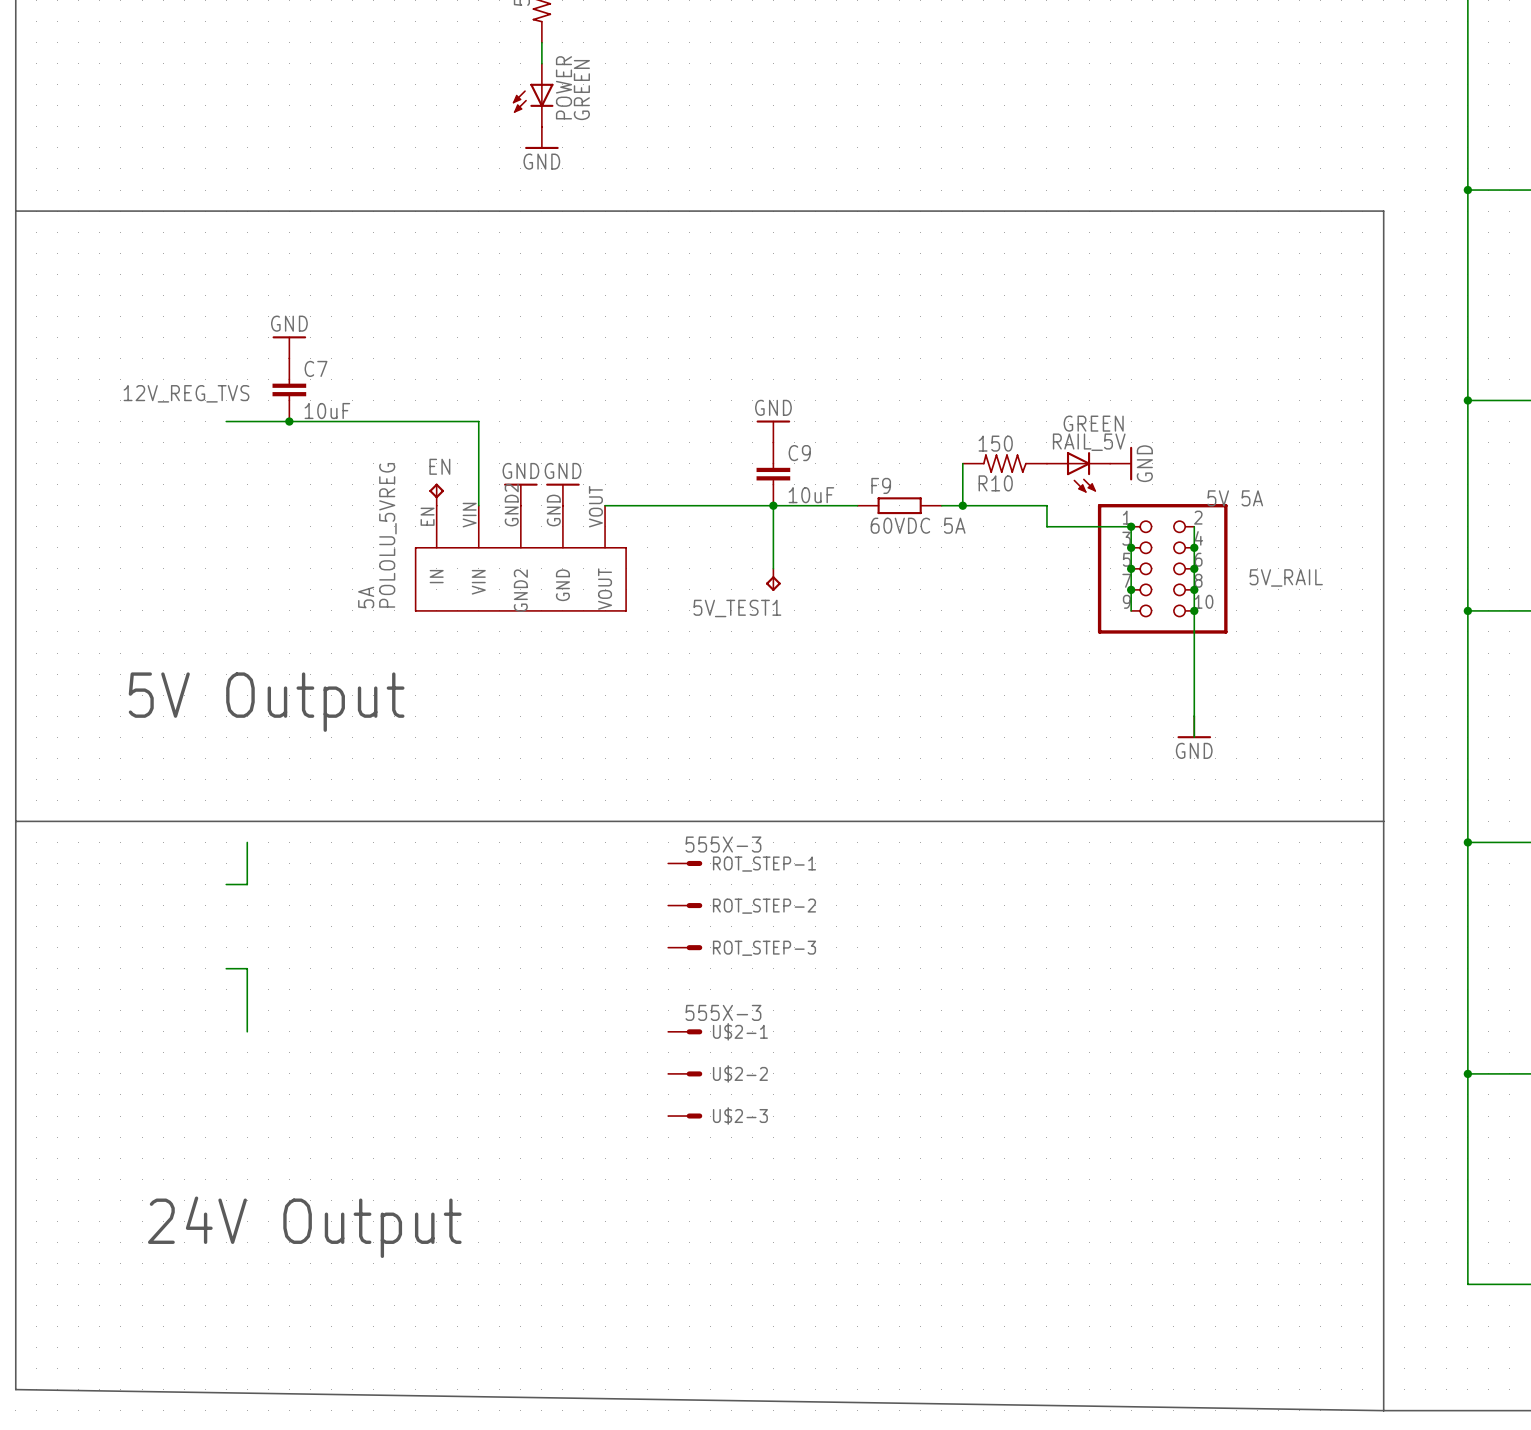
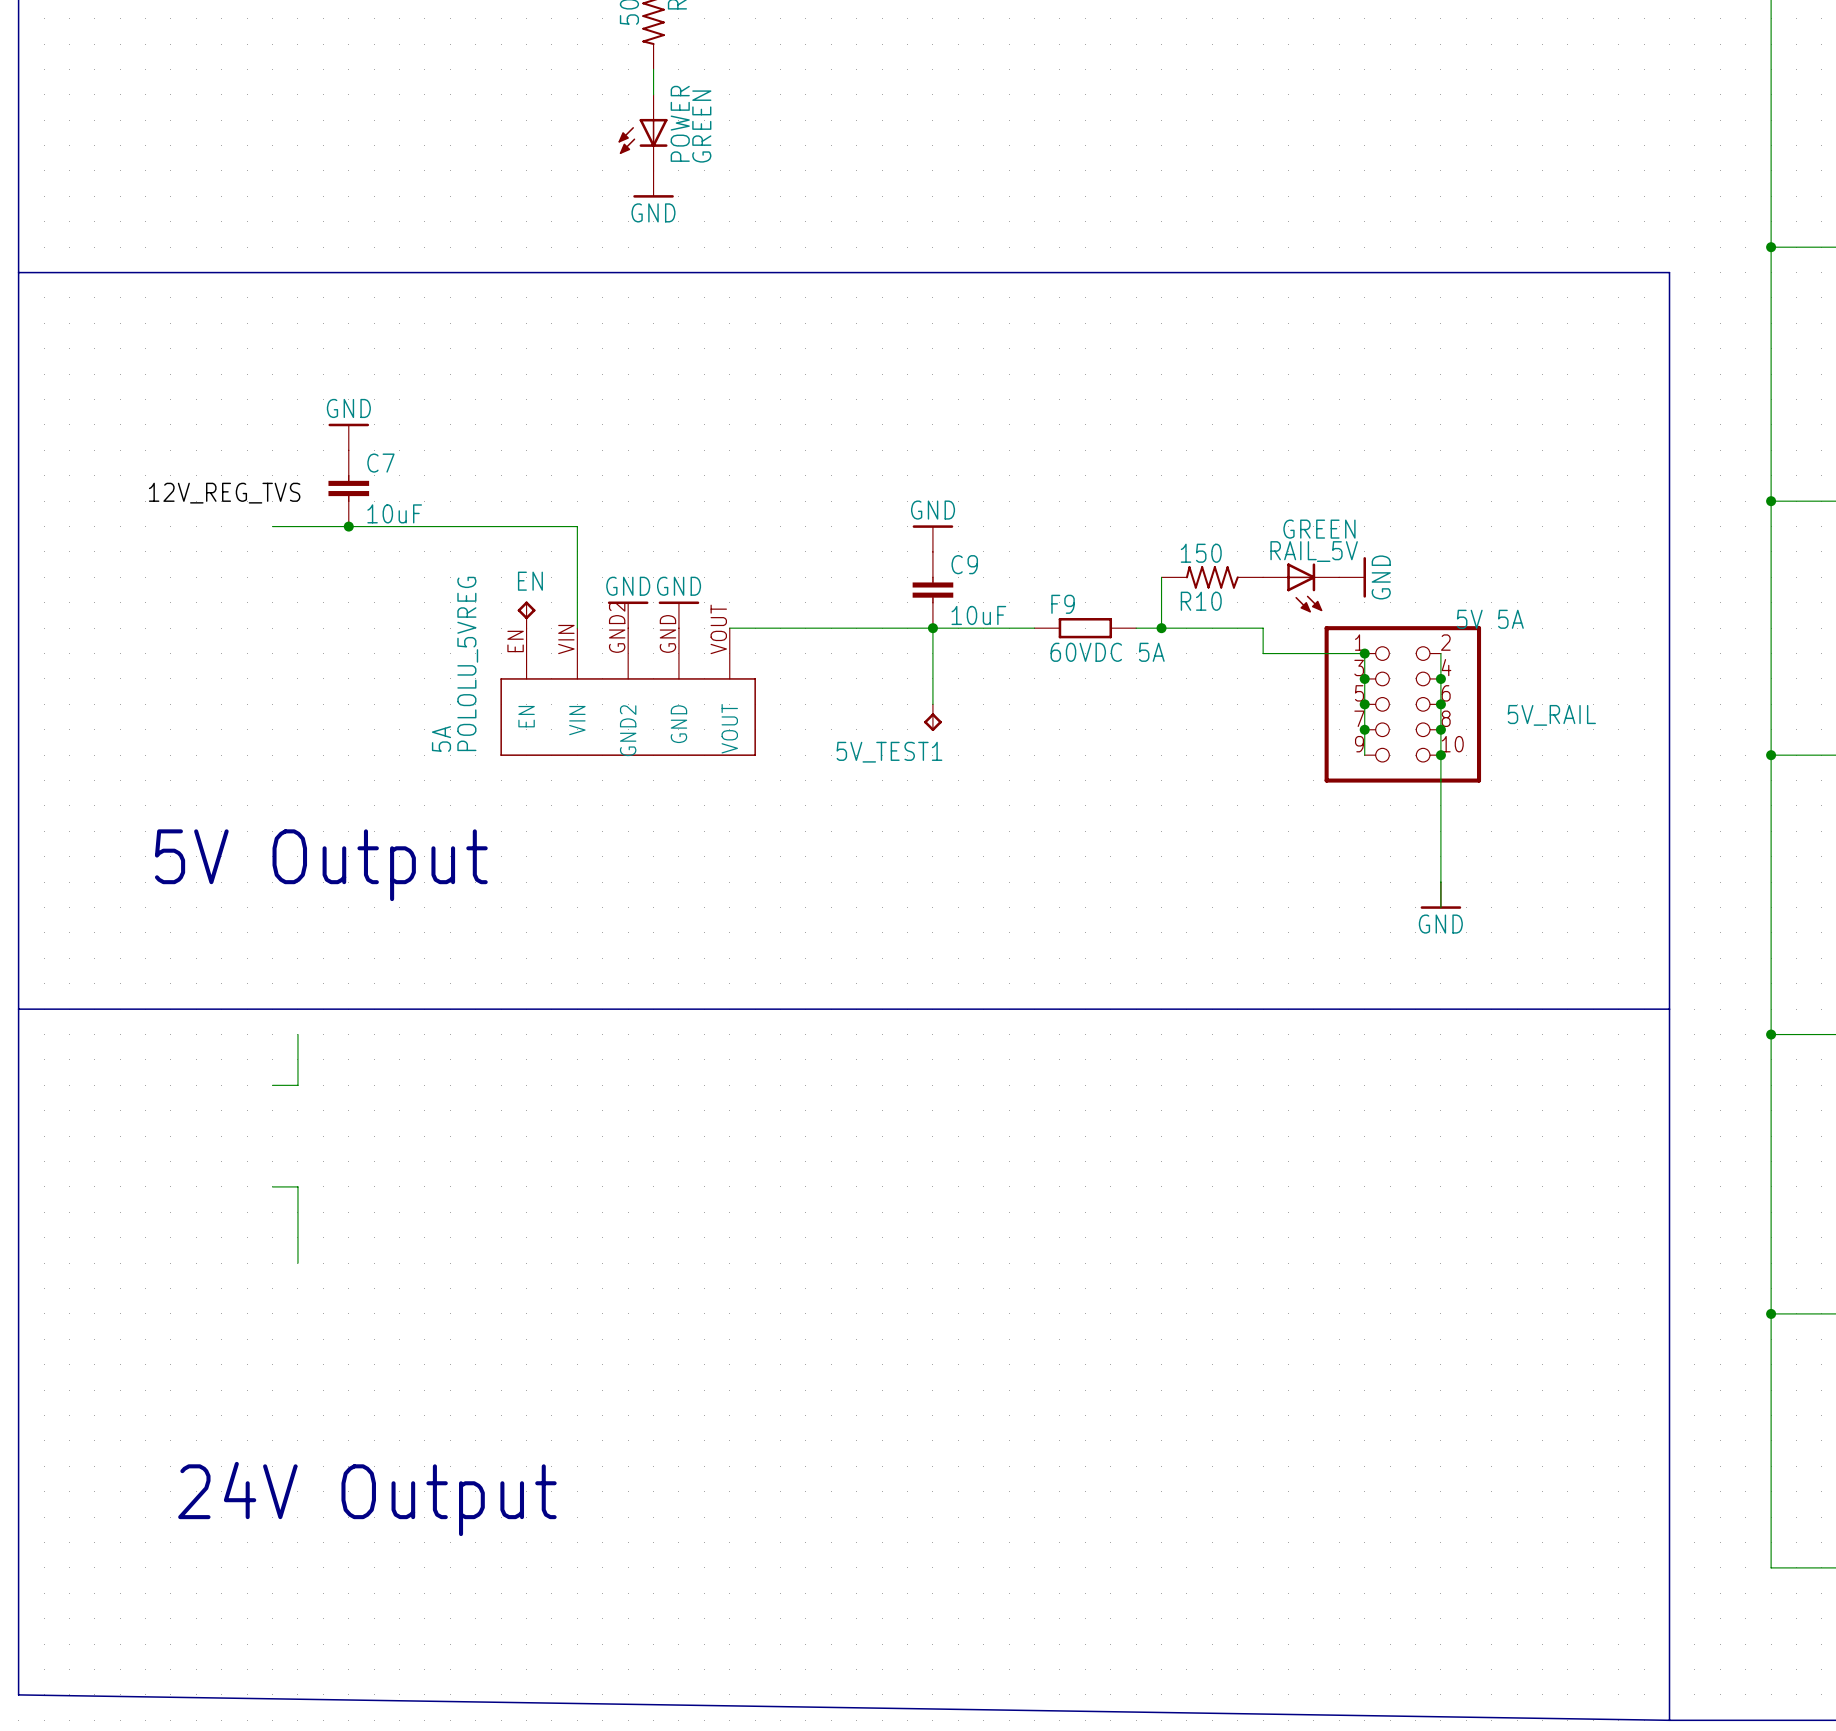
5A pin name: IN (436, 576) -> EN (526, 716)
ROT_STEP-1: 555X-3 (685, 863) -> none
ROT_STEP-2: (685, 905) -> none
ROT_STEP-3: (685, 947) -> none
U$2-1: 555X-3 (685, 1031) -> none
U$2-2: (685, 1073) -> none
U$2-3: (685, 1116) -> none

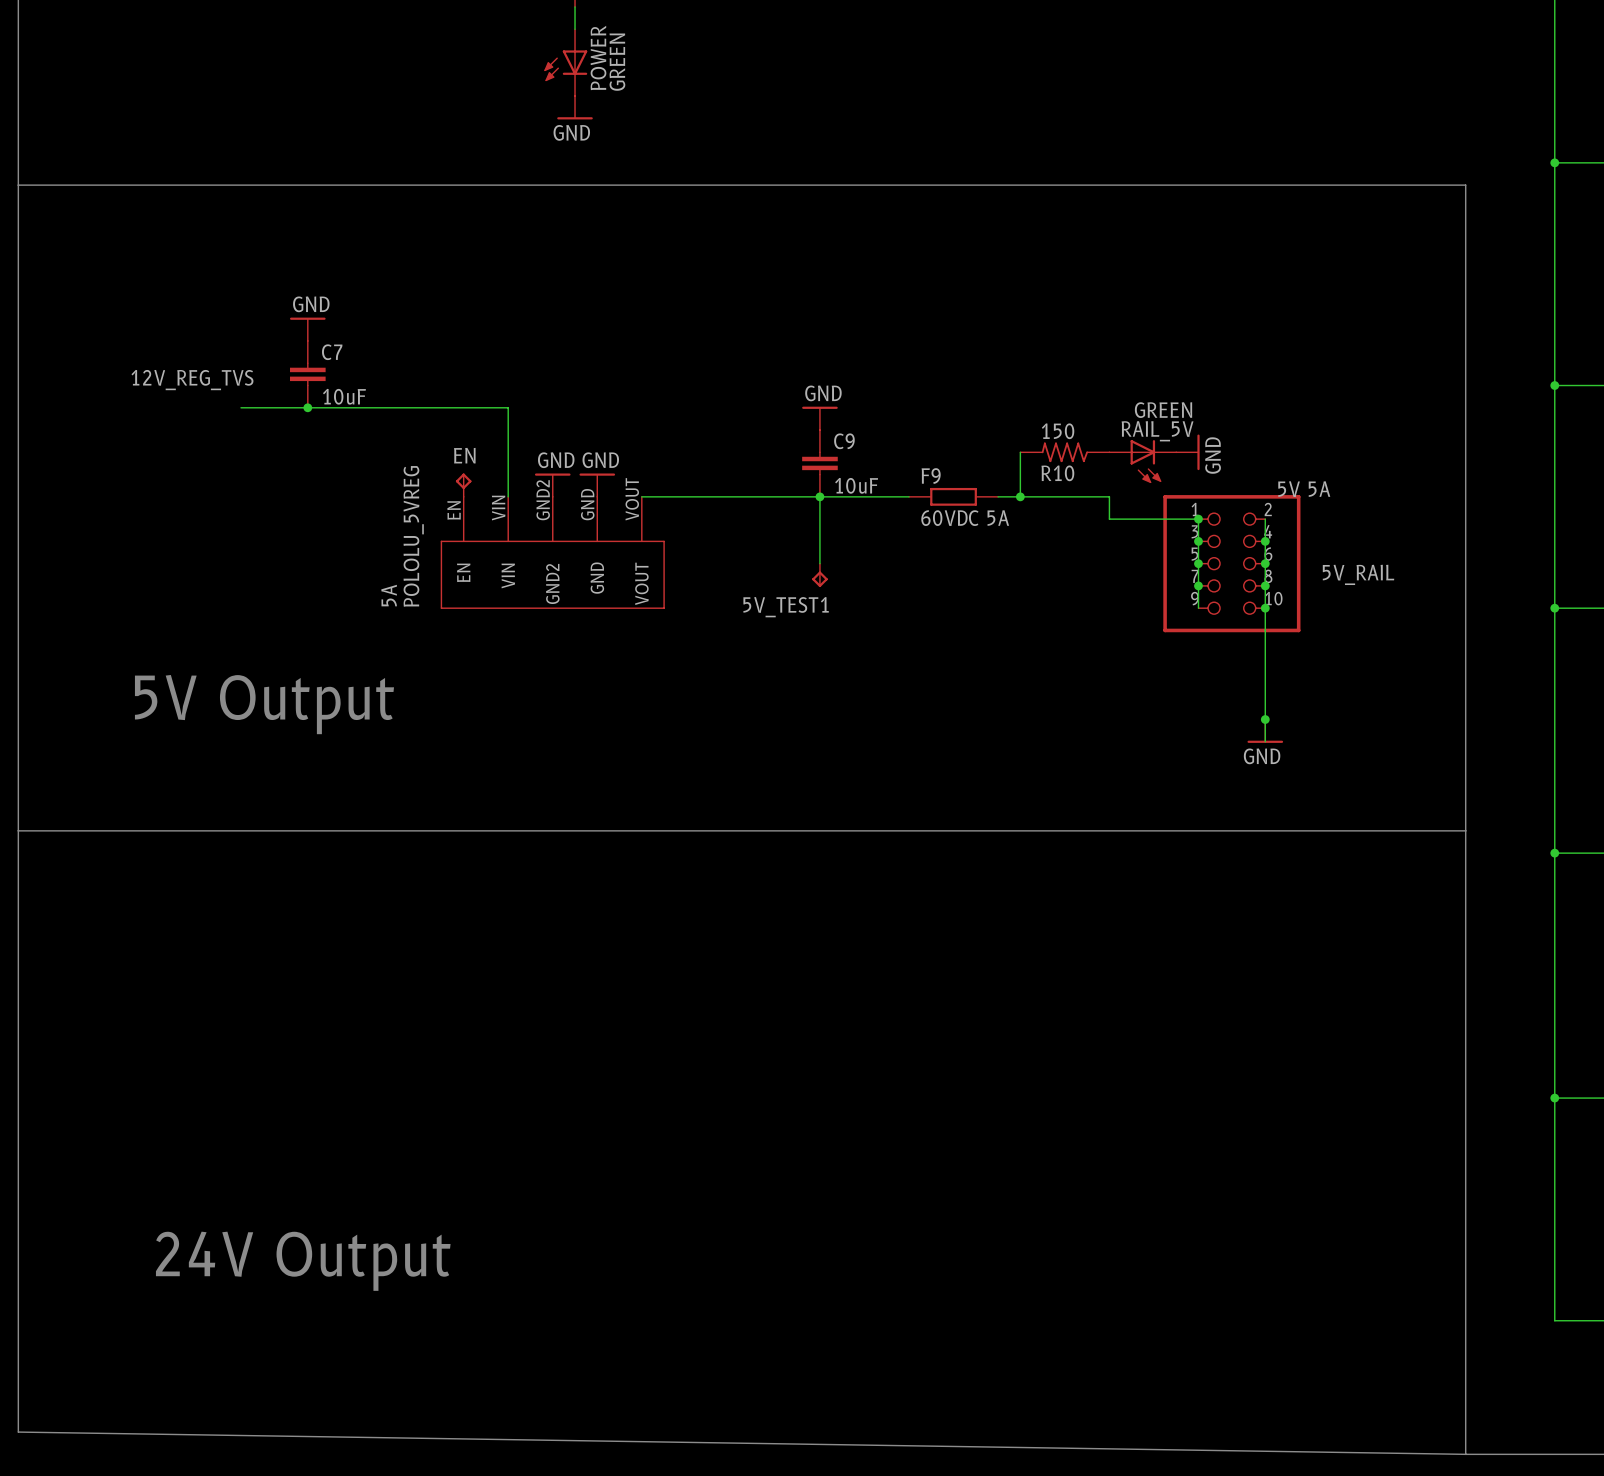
junction: none -> (1265, 719)
wire: (297, 1034) (297, 1085) (272, 1085) -> none
wire: (272, 1186) (297, 1186) (297, 1263) -> none

